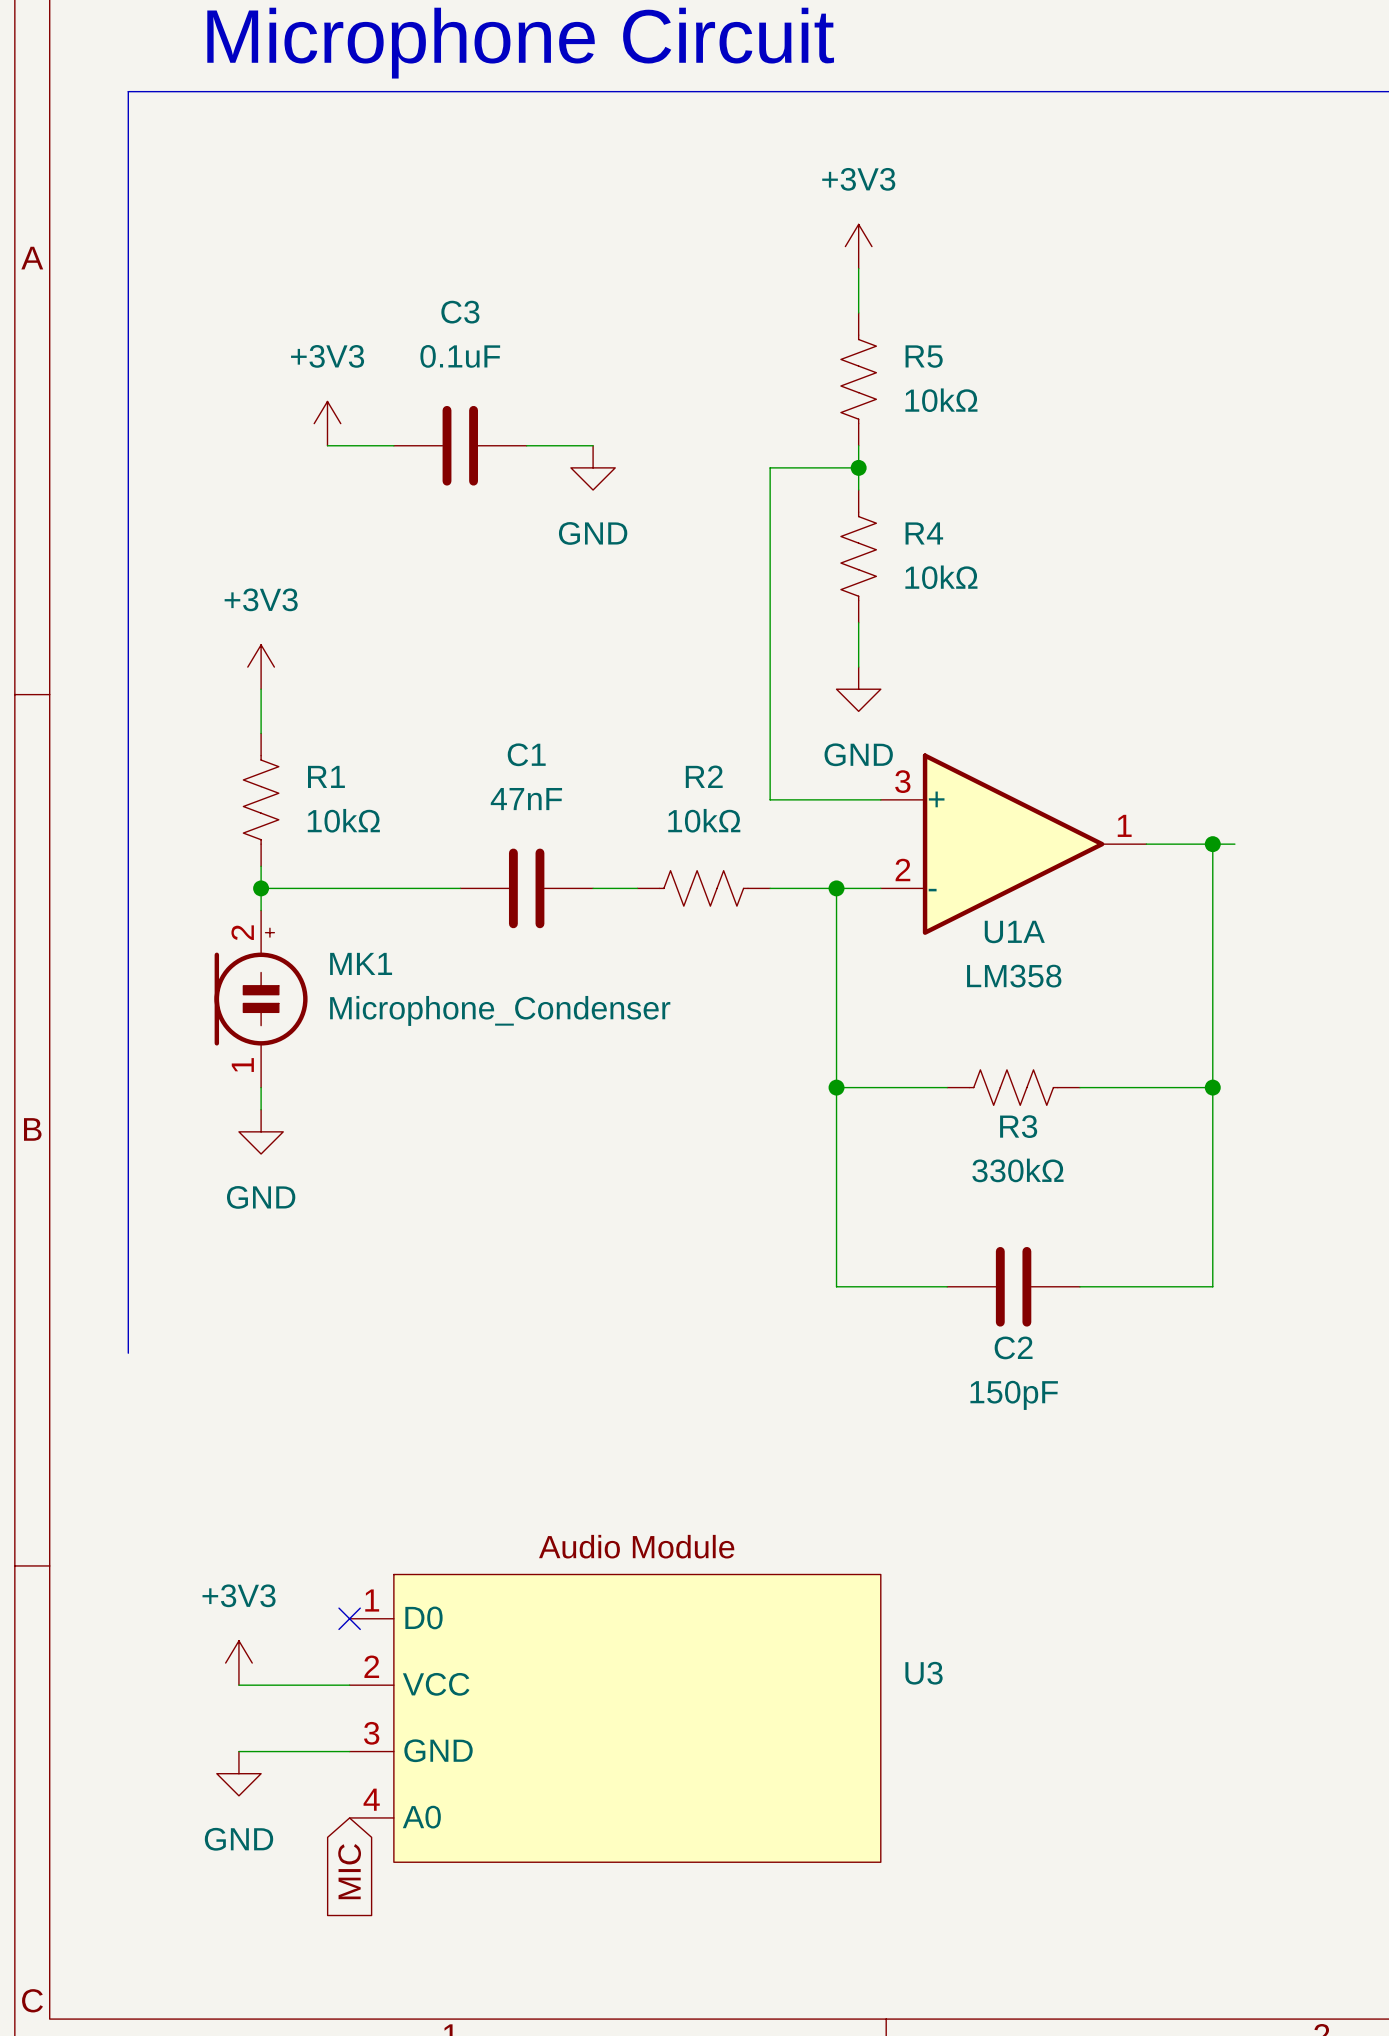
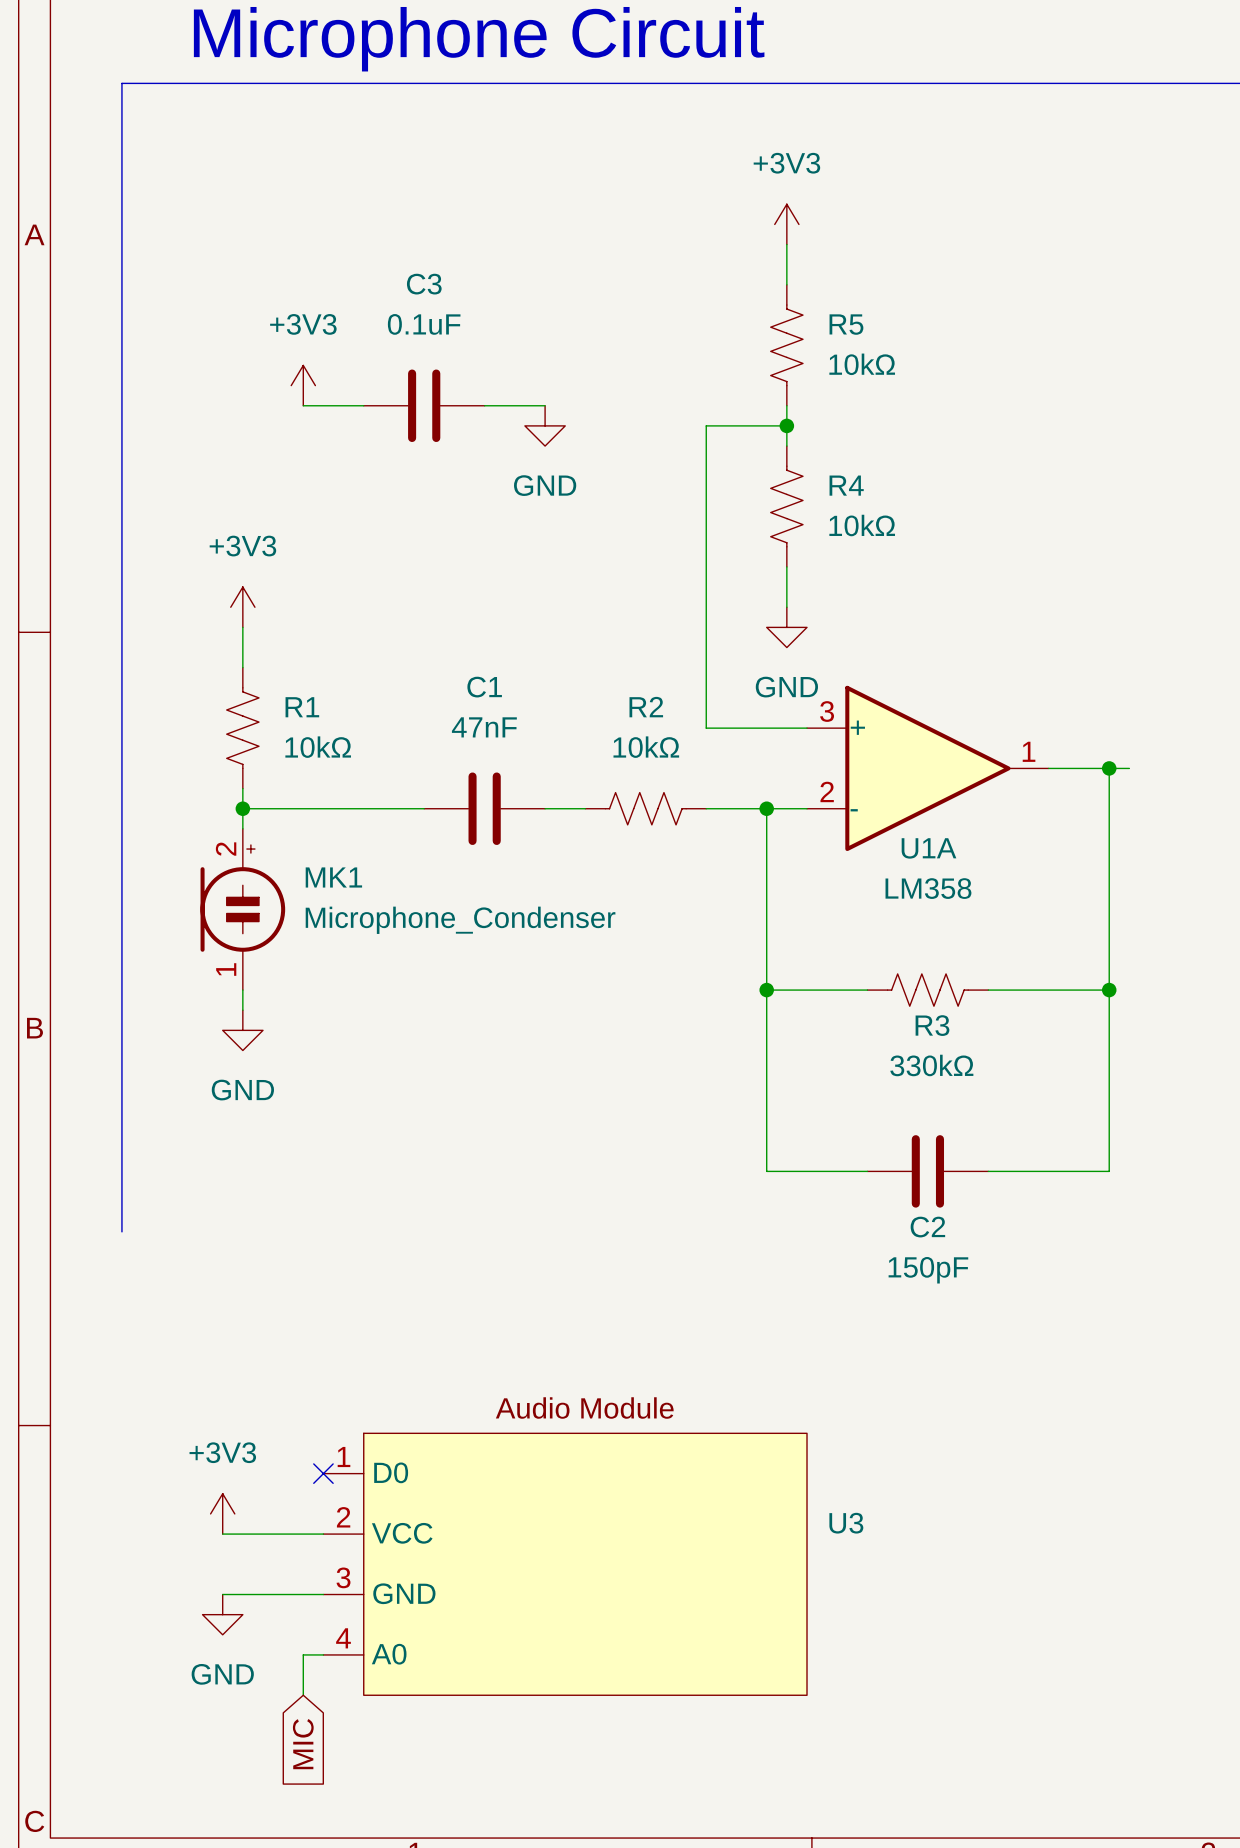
wire: none -> (323, 1654) (303, 1654) (303, 1695)
global label position: MIC (349, 1871) -> MIC (303, 1744)

